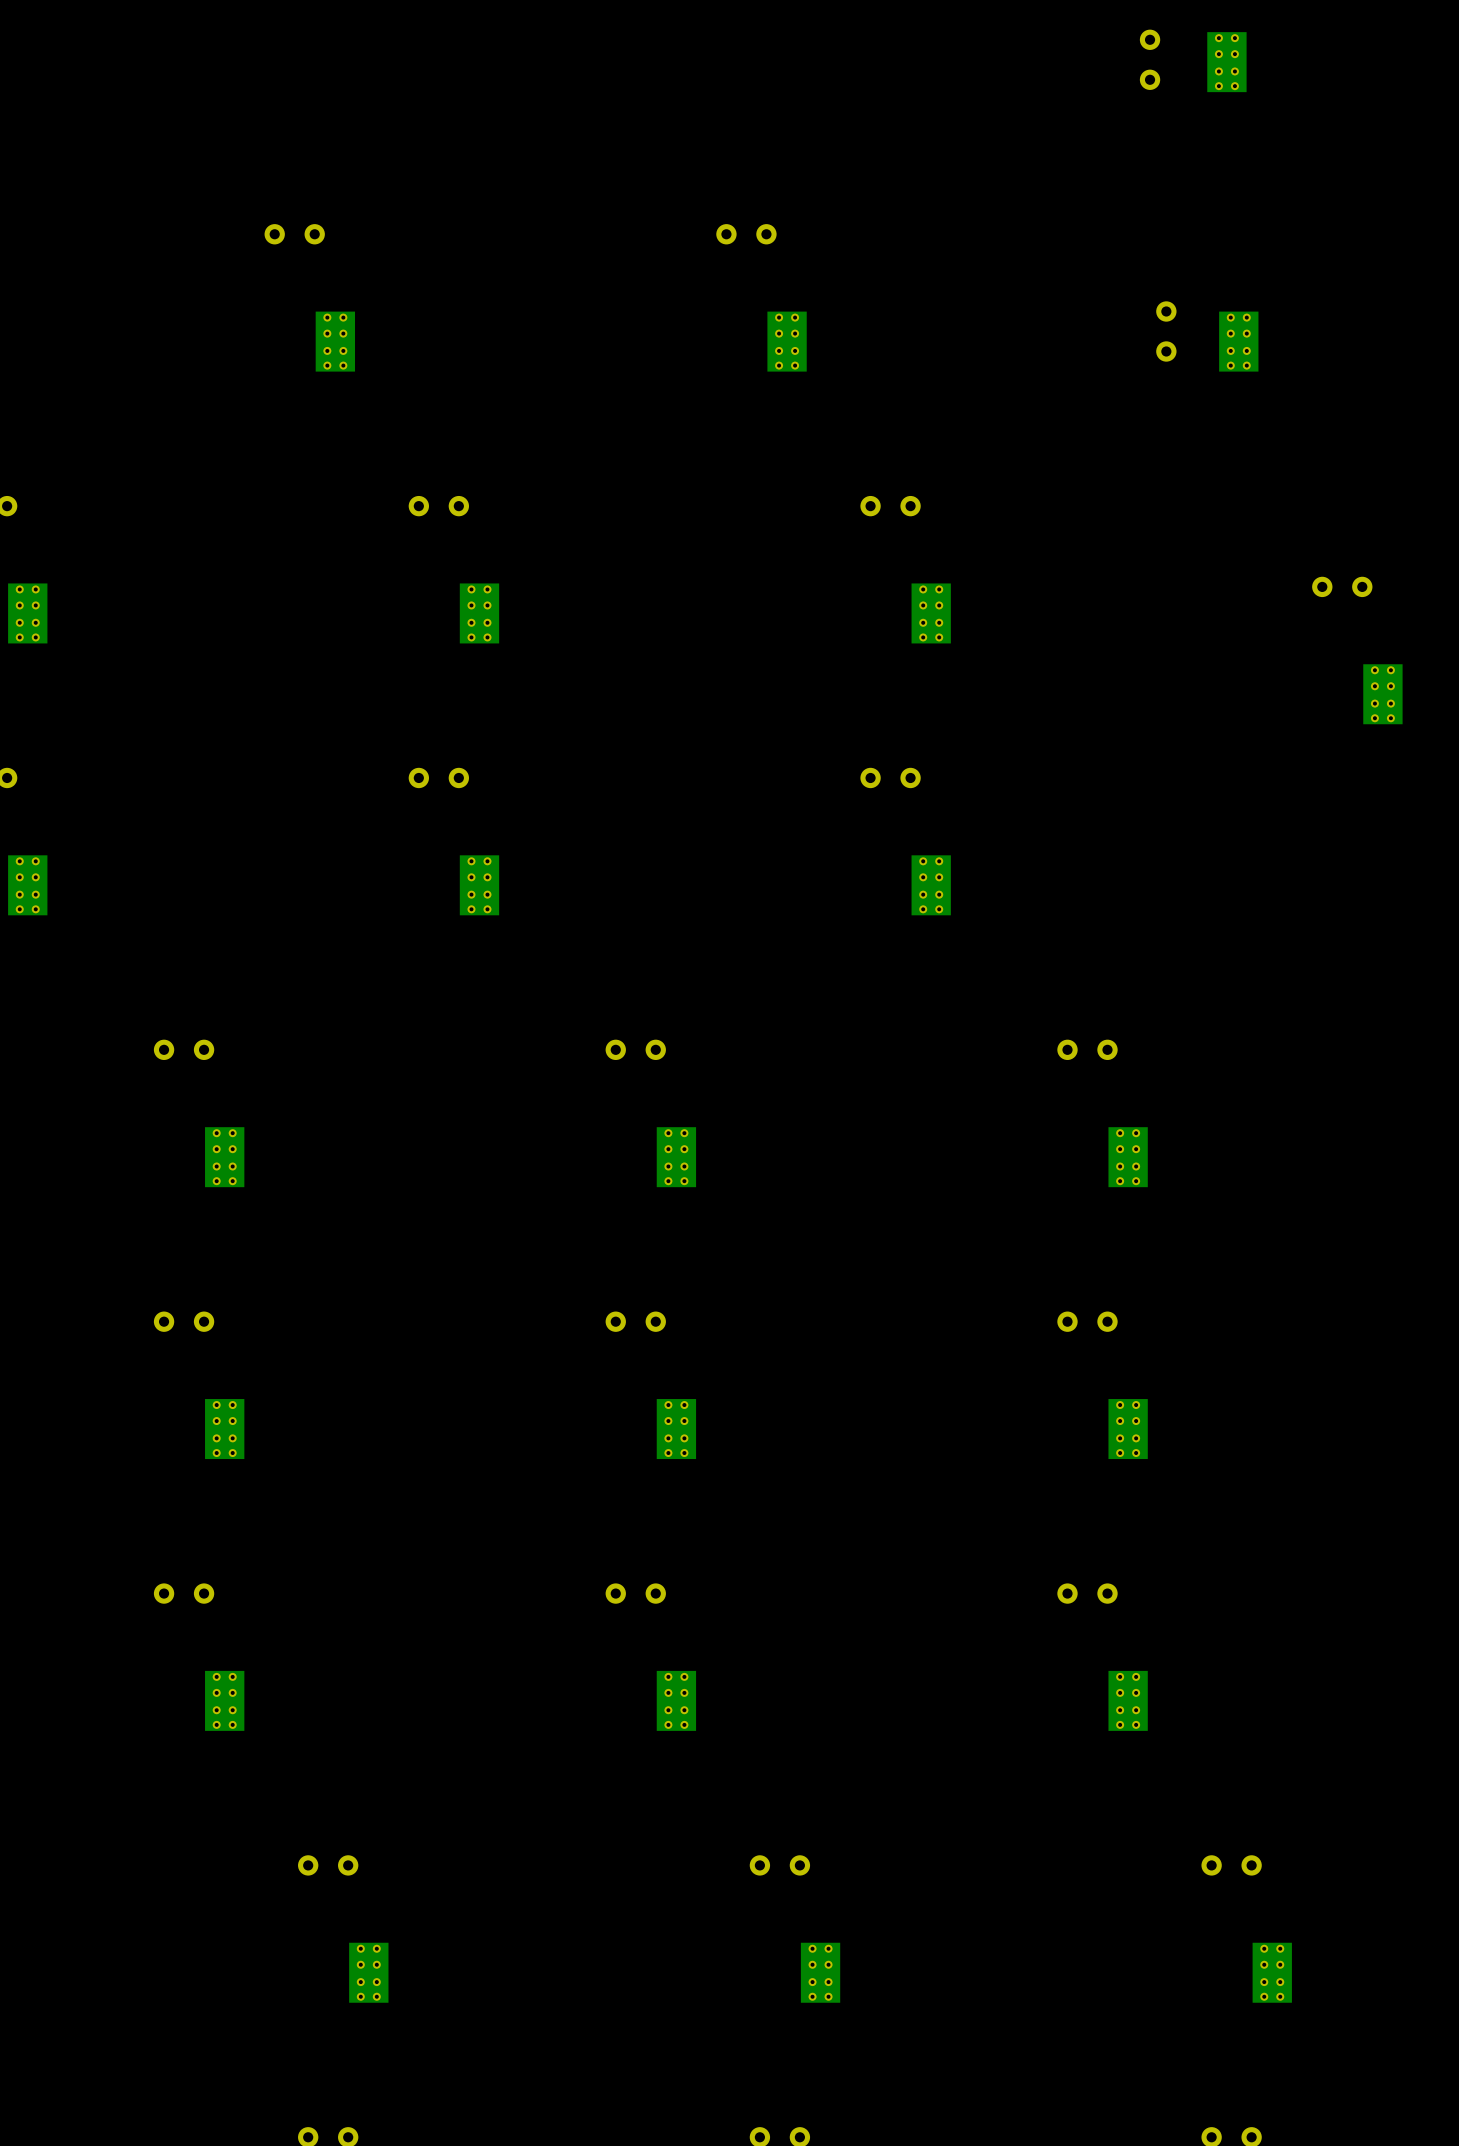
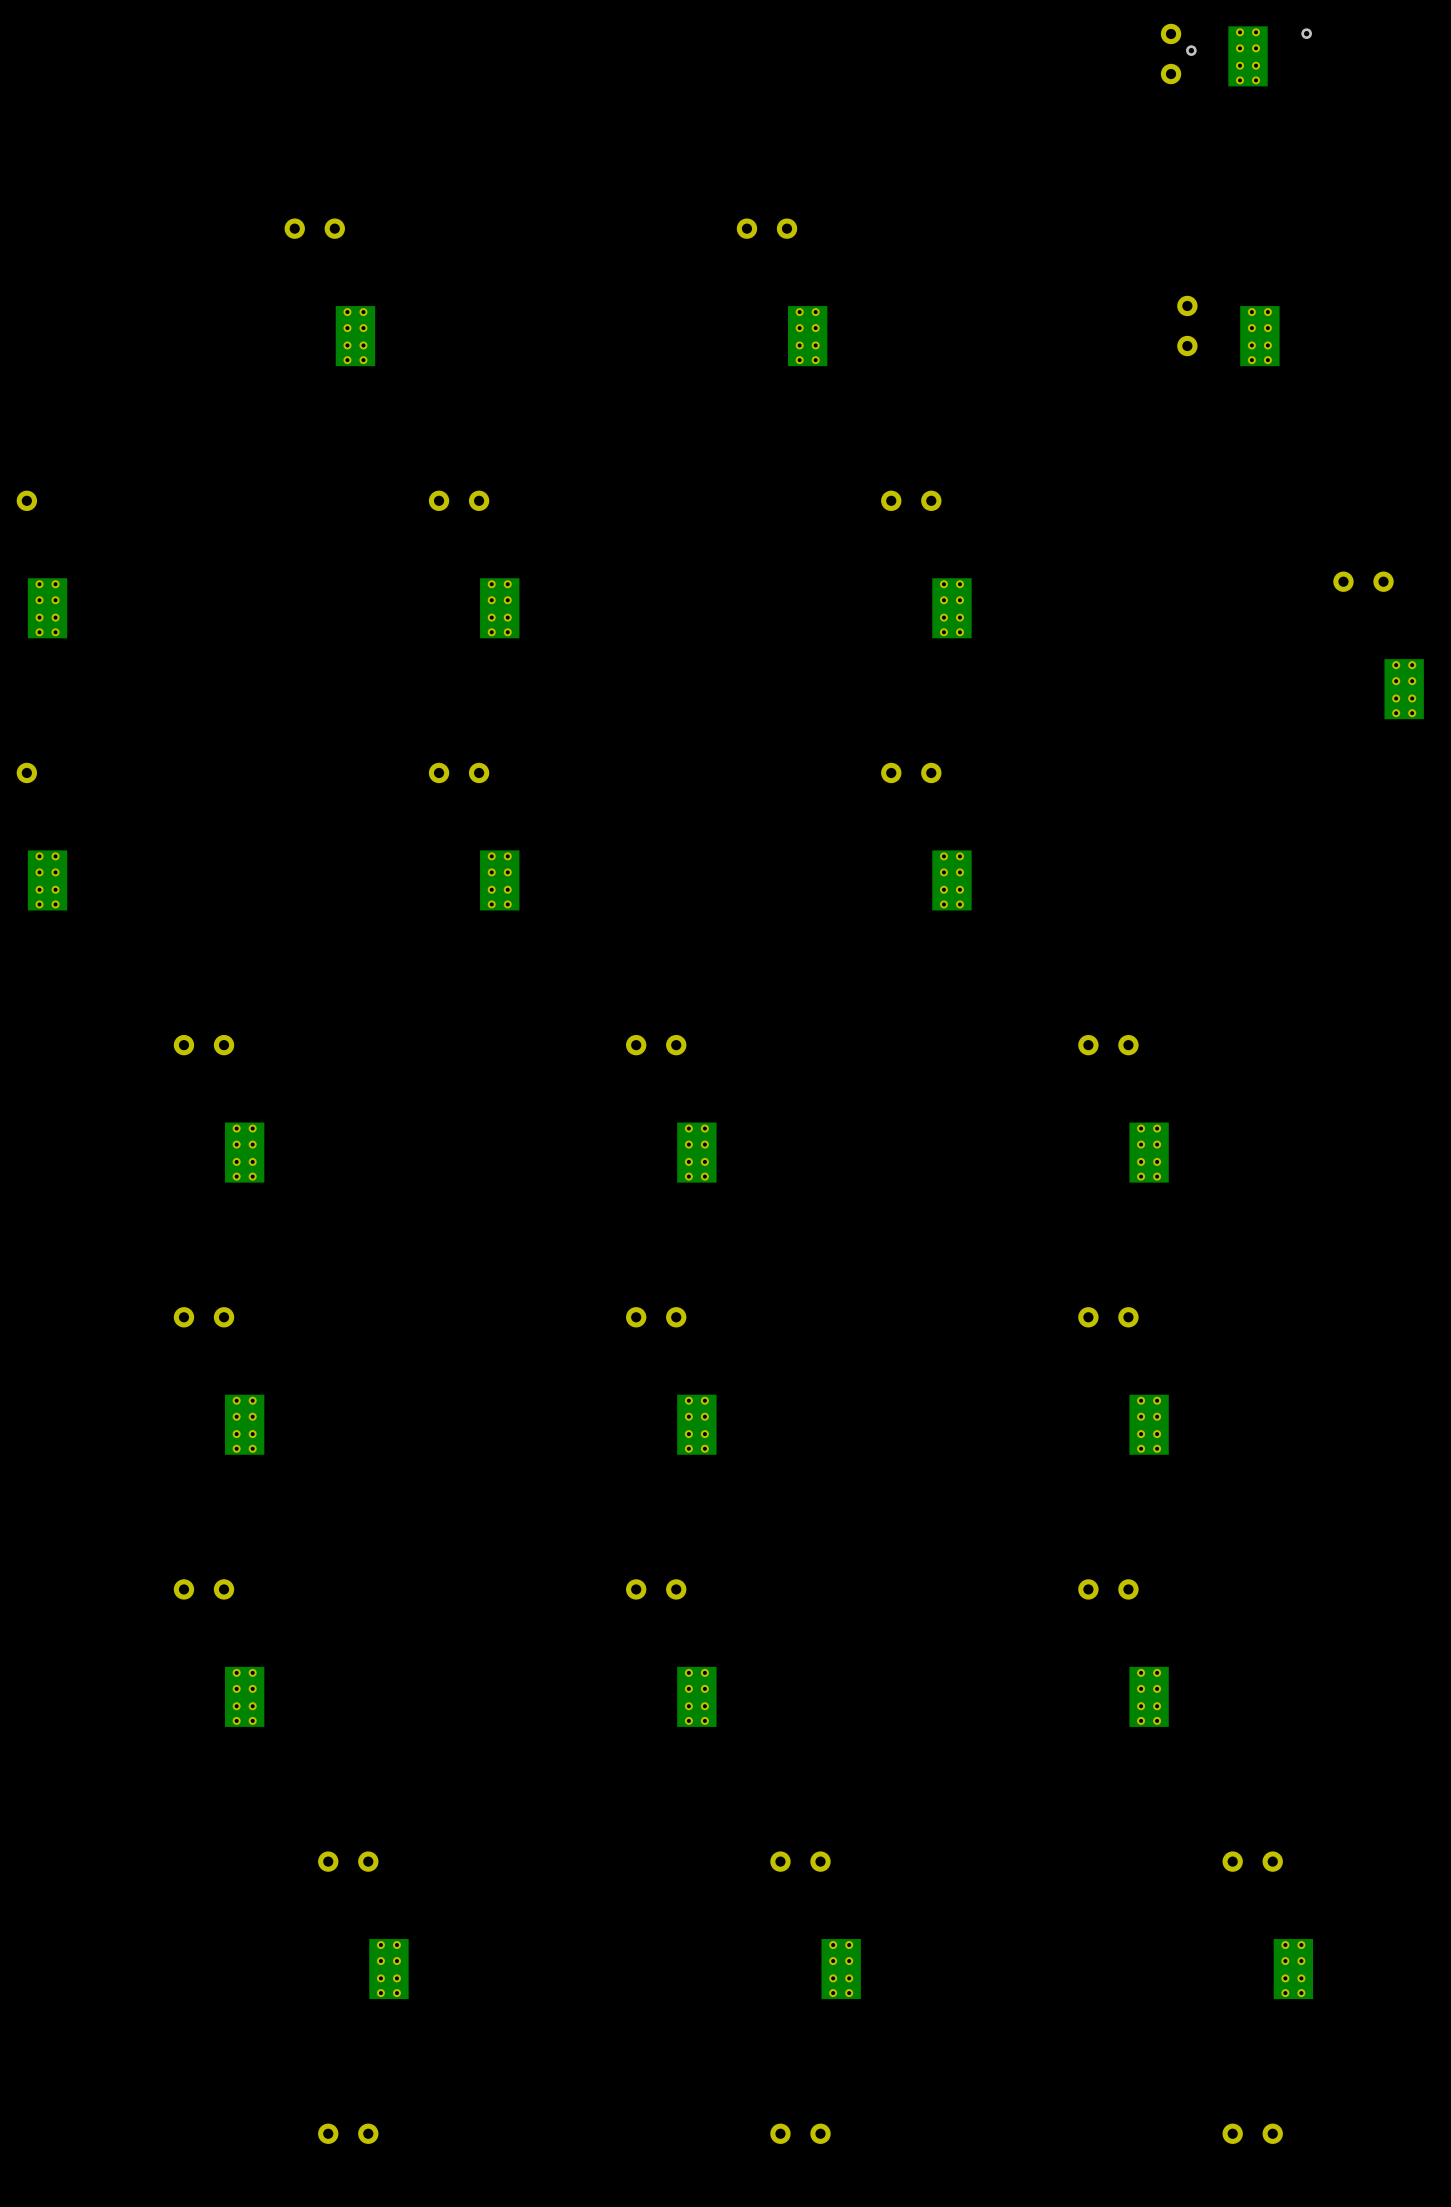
via: none -> (1306, 33)
via: none -> (1191, 50)

